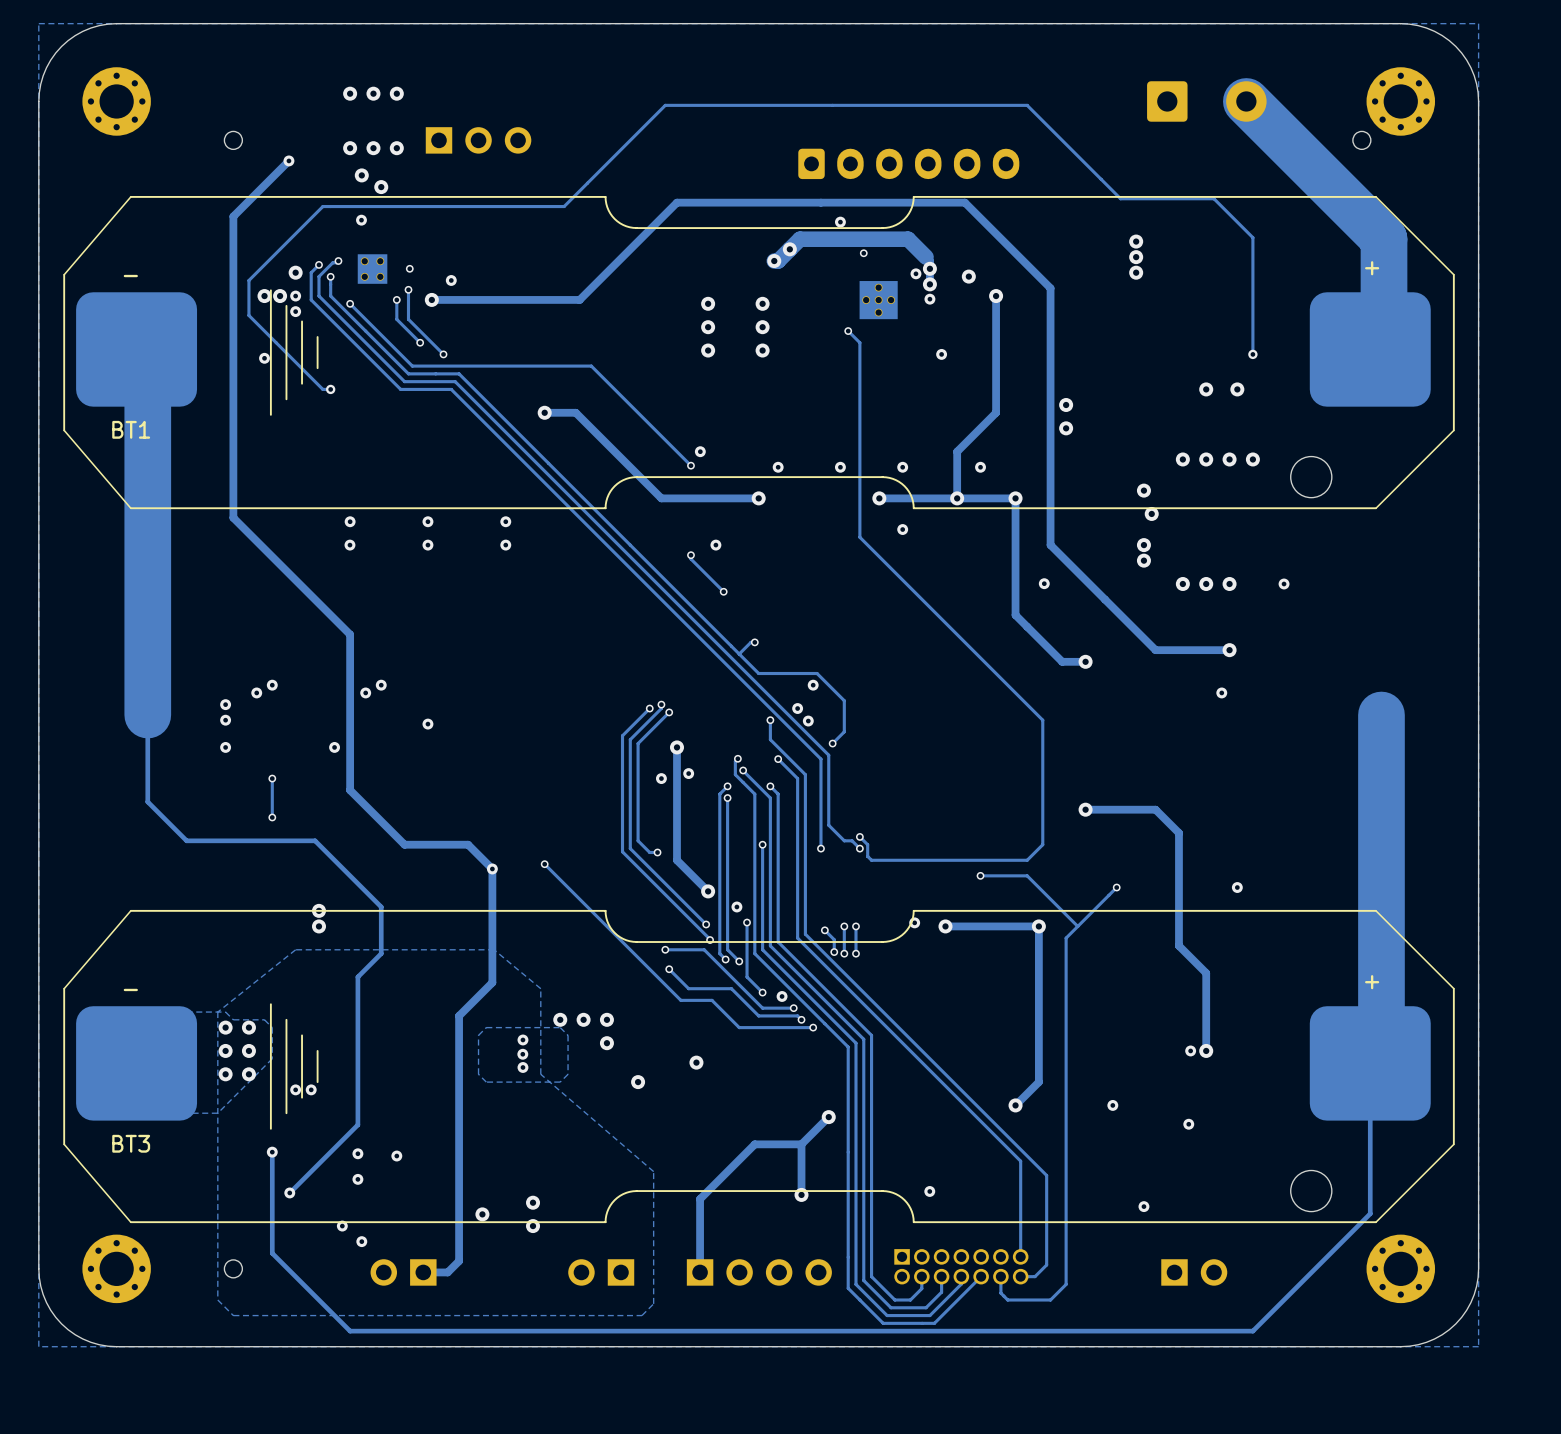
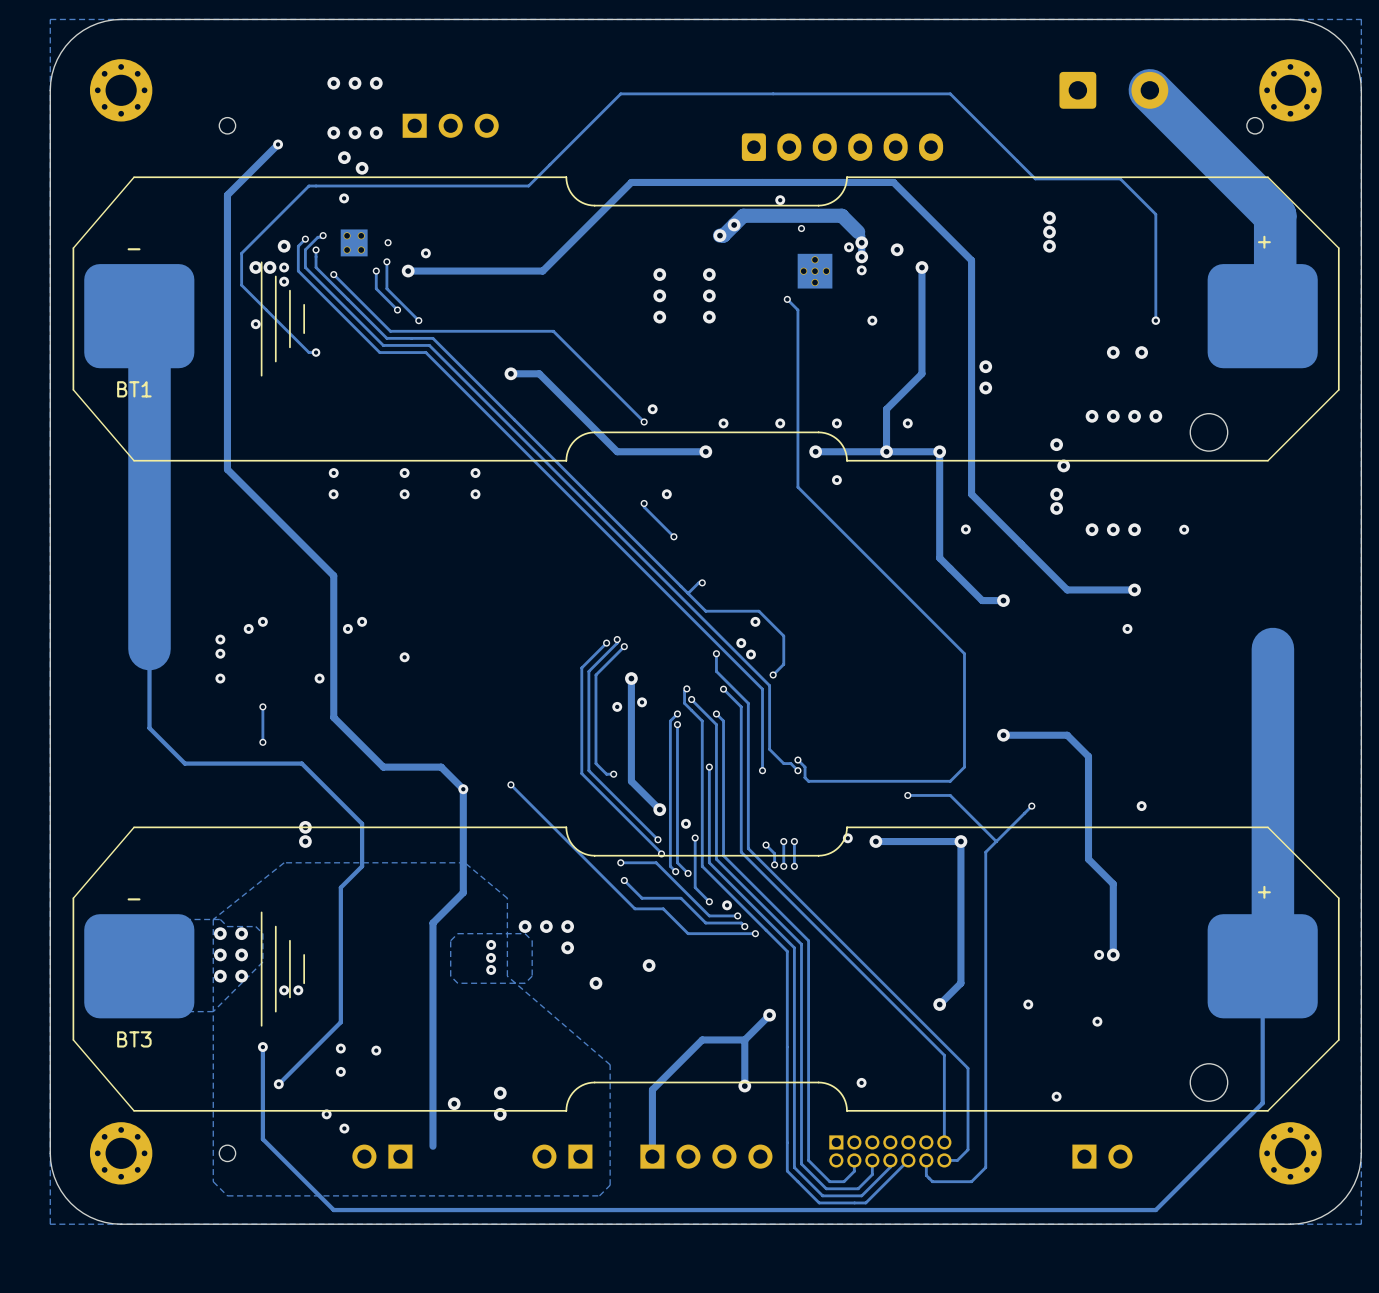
track: (459, 1261) (447, 1272) (423, 1272) -> none

